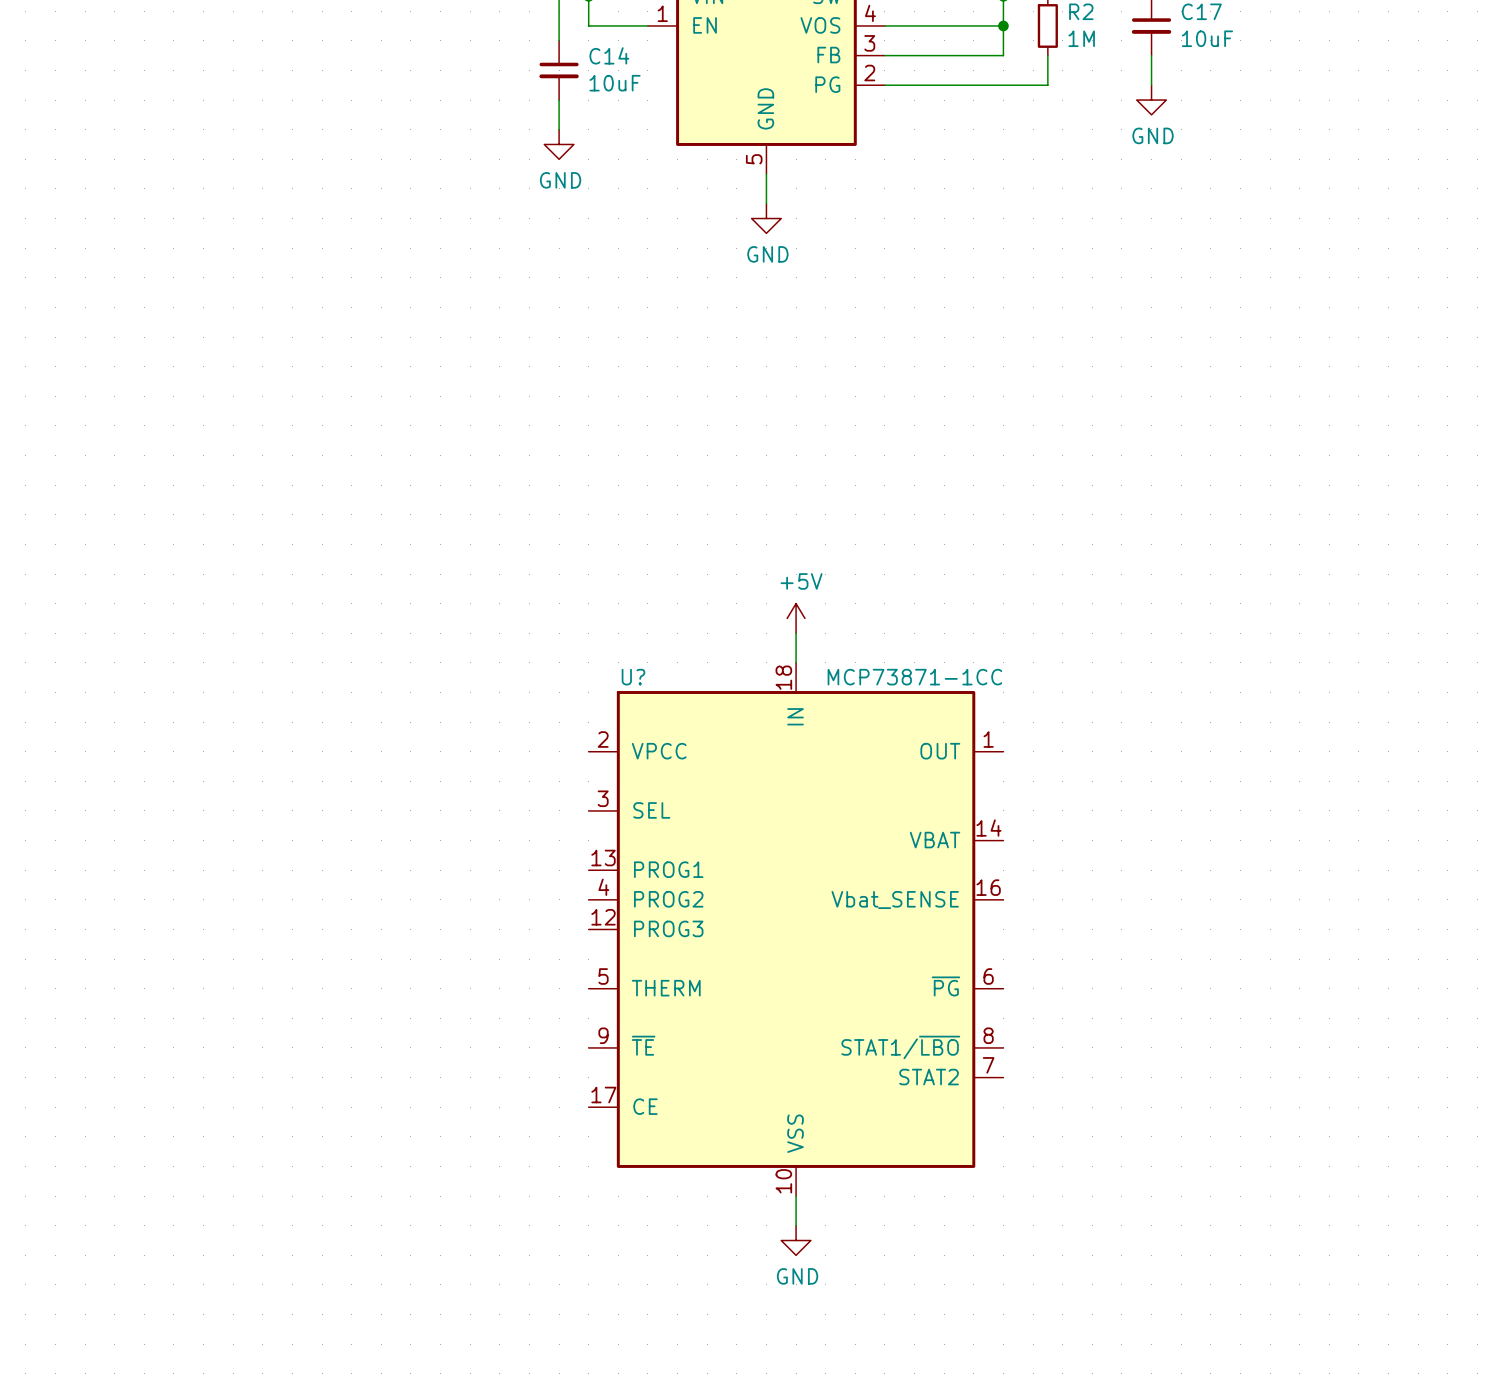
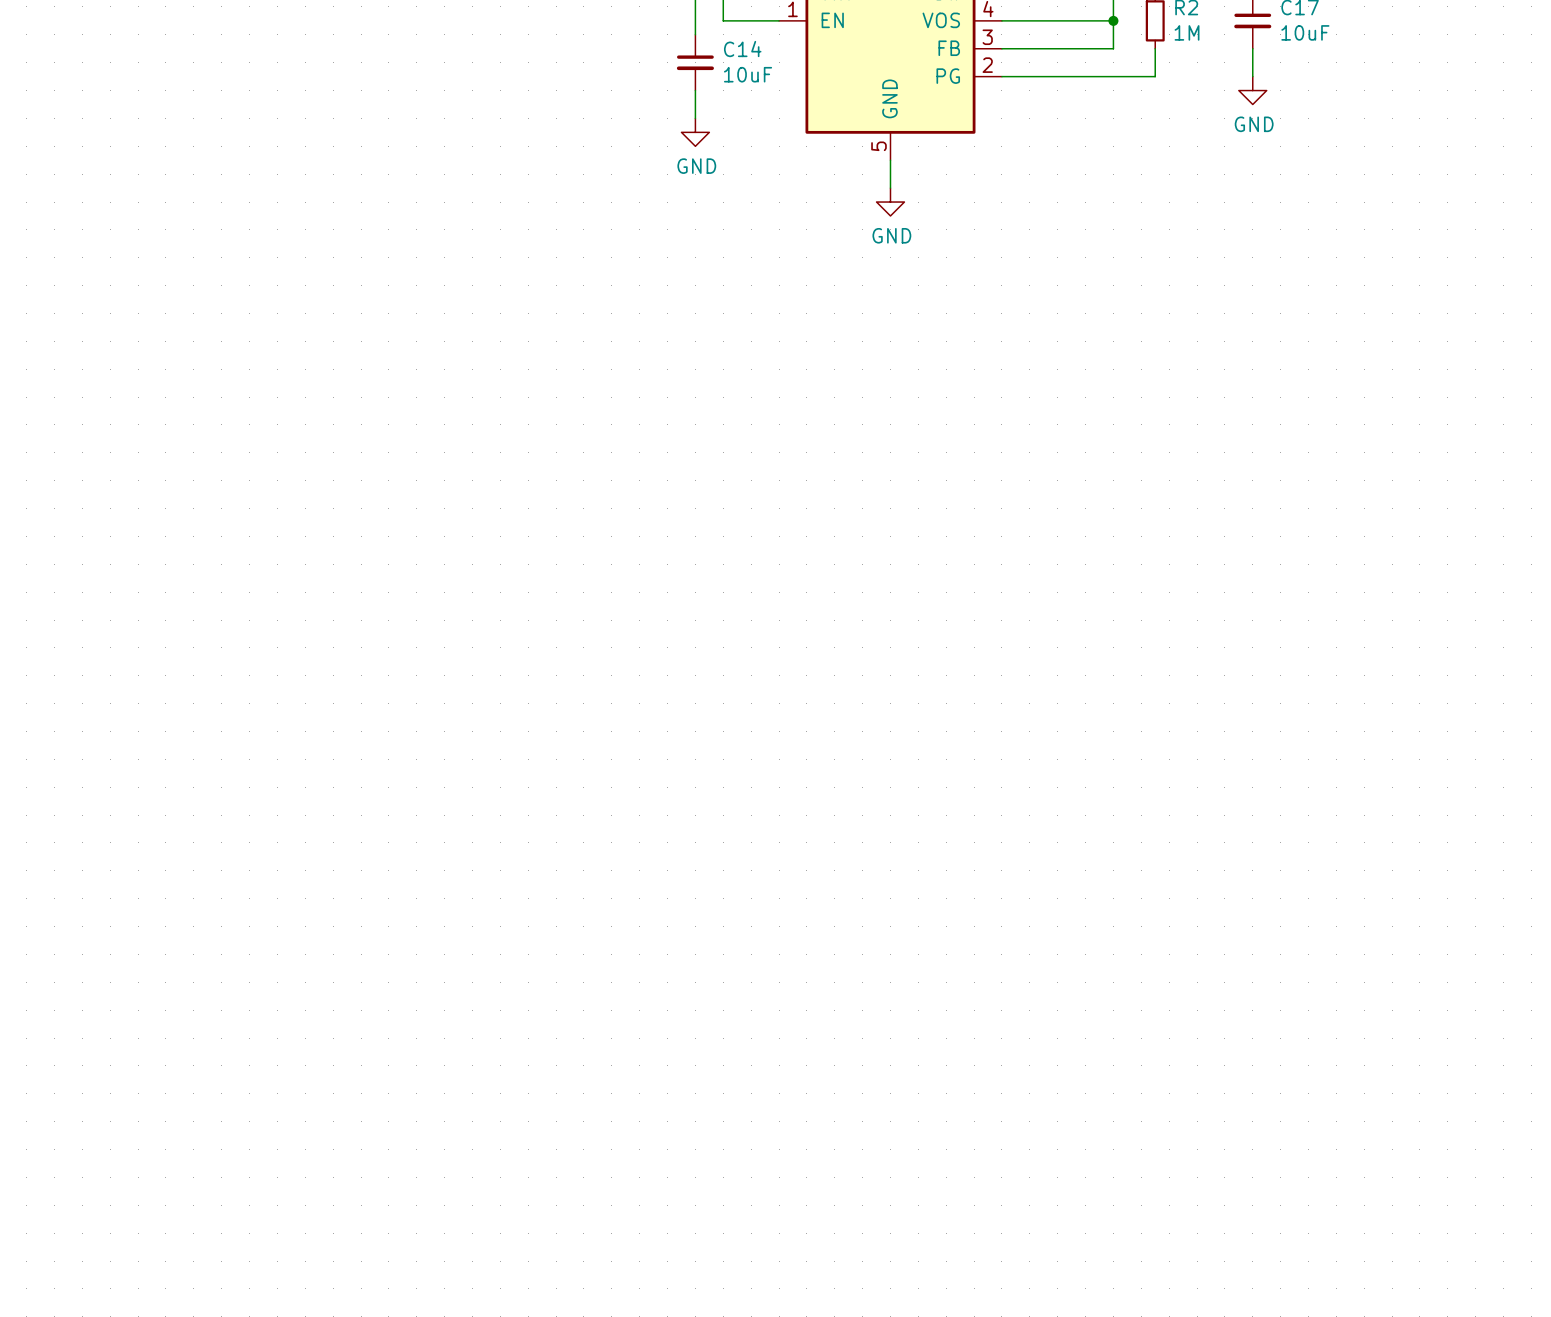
power symbol: +5V (796, 618) -> none
wire: (796, 633) (796, 662) -> none
U?: MCP73871-1CC (796, 929) -> none
wire: (796, 1196) (796, 1225) -> none
power symbol: GND (796, 1240) -> none

